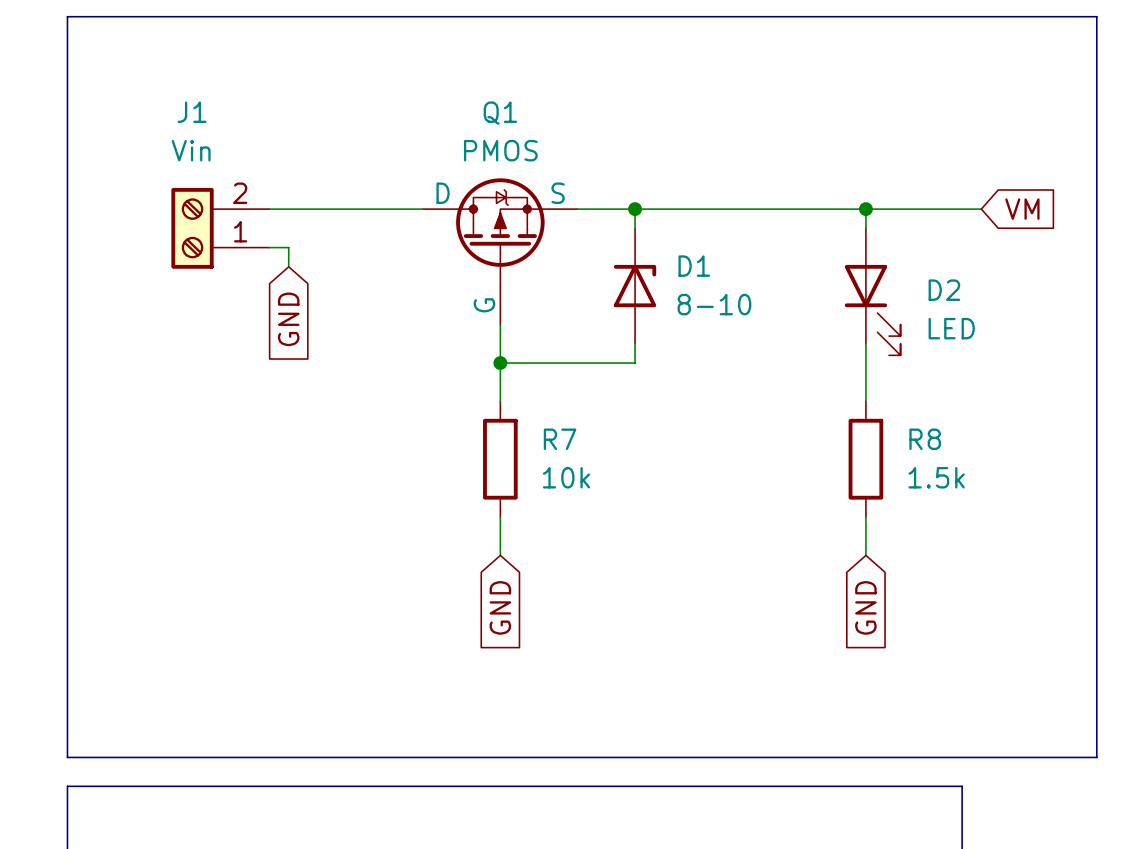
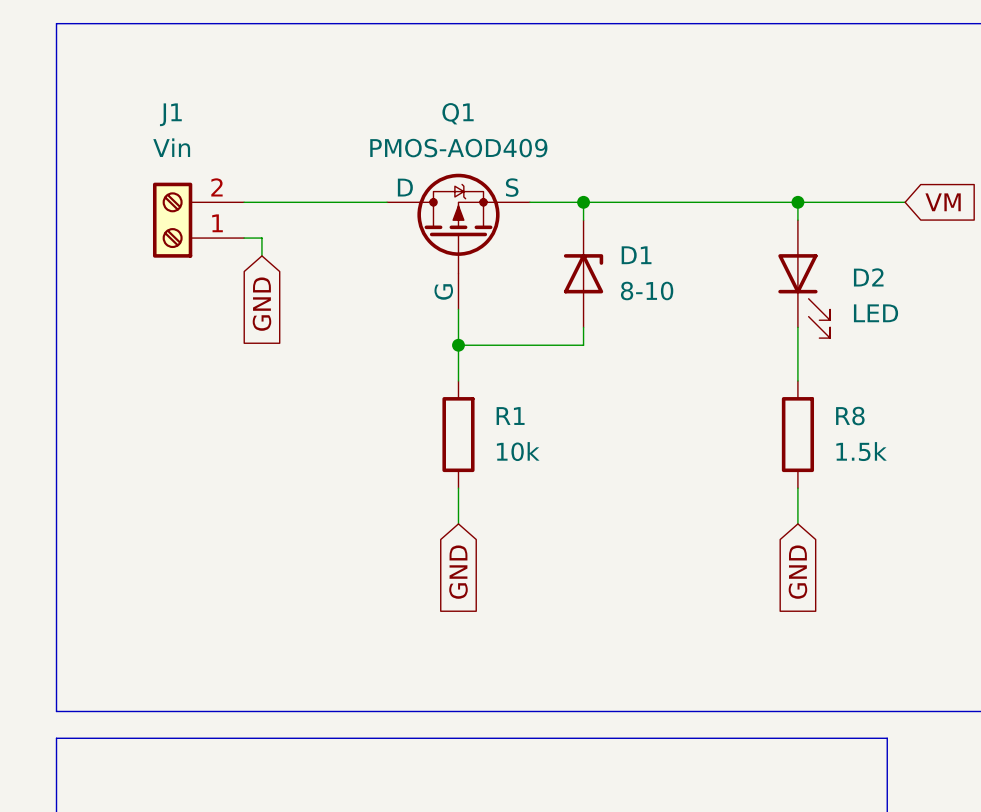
Q1 value: PMOS (500, 150) -> PMOS-AOD409 (458, 148)
R7 name: R7 (560, 439) -> R1 (510, 416)

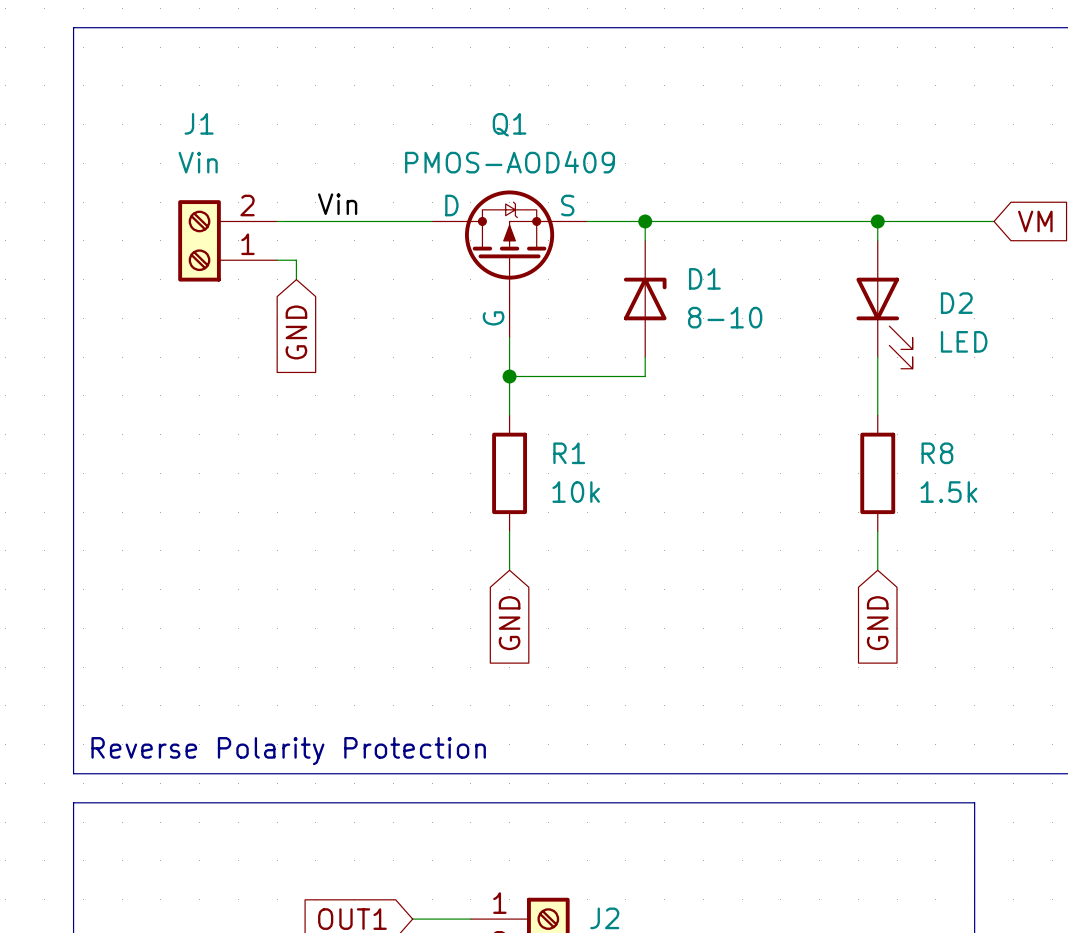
label: none -> Vin (337, 204)
text: none -> Reverse Polarity Protection (288, 751)

